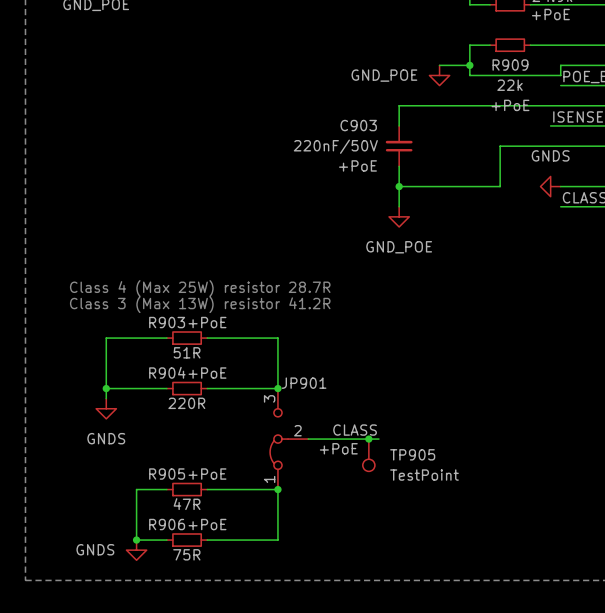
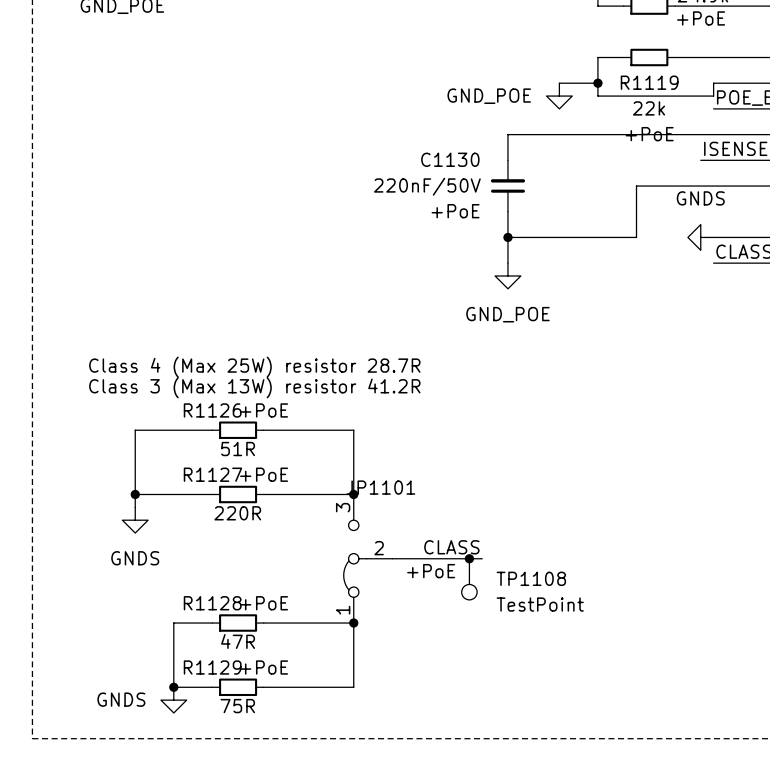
R909 name: R909 (510, 65) -> R1119 (649, 82)
C903 name: C903 (358, 125) -> C1130 (450, 159)
R903 name: R903 (167, 322) -> R1126 (212, 410)
R904 name: R904 (167, 372) -> R1127 (212, 474)
JP901 name: JP901 (304, 383) -> JP1101 (380, 487)
TP905 name: TP905 (412, 454) -> TP1108 (531, 578)
R905 name: R905 (167, 474) -> R1128 (212, 603)
R906 name: R906 (167, 524) -> R1129 (212, 667)

